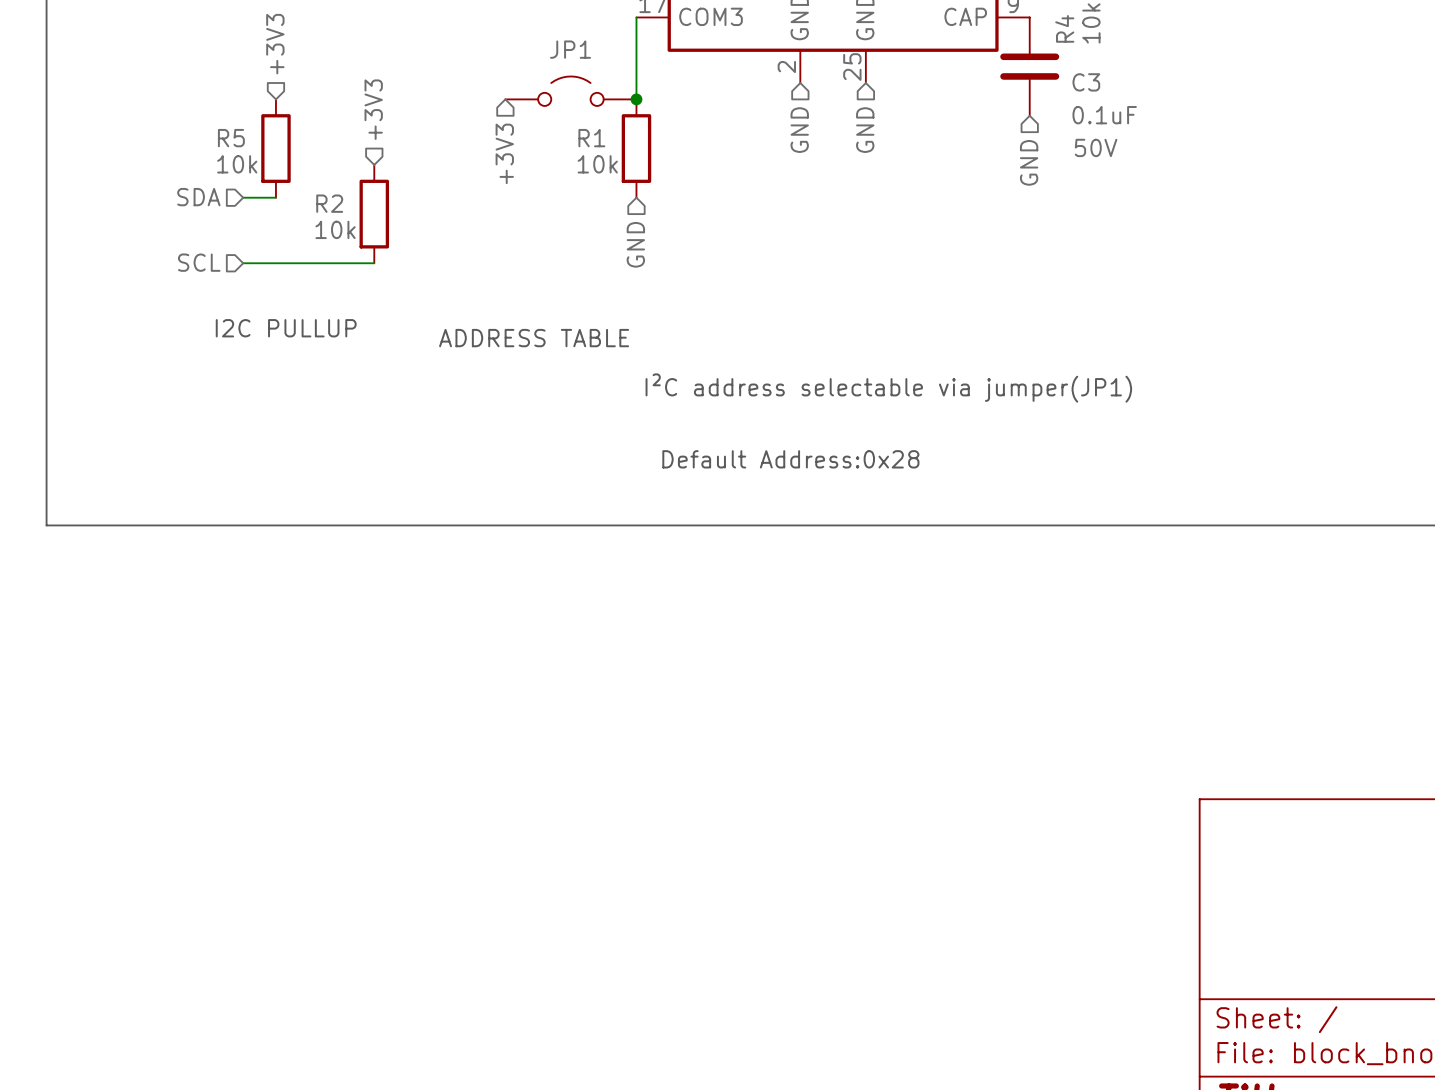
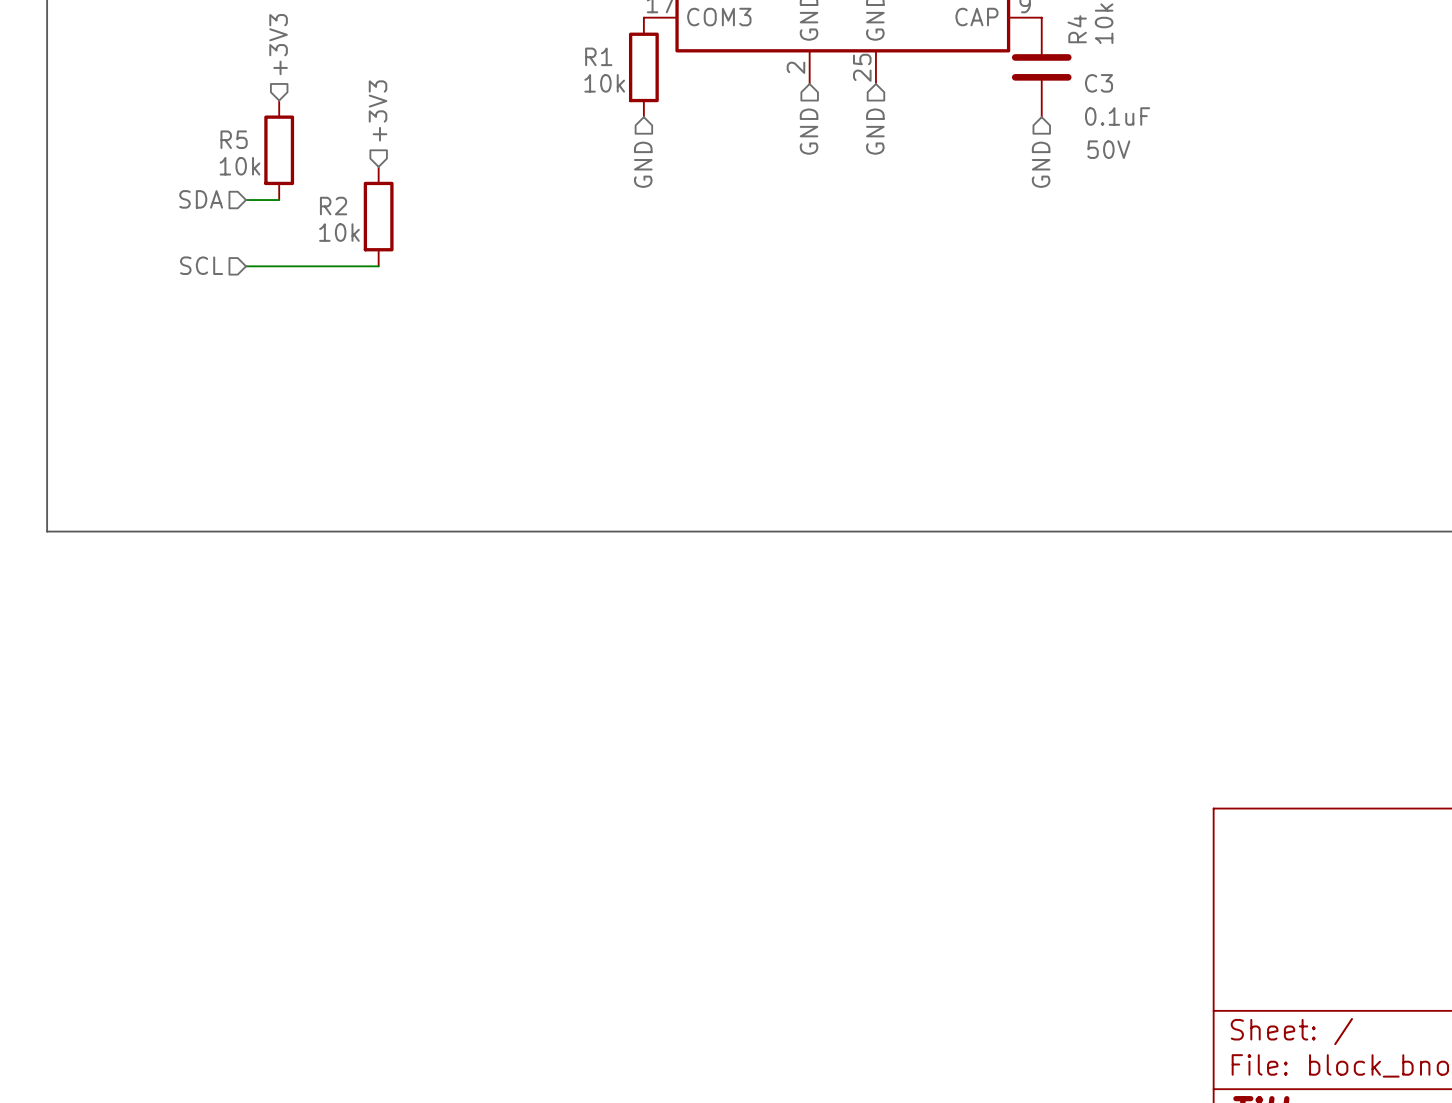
wire: (636, 17) (636, 99) -> none
JP1: (570, 91) -> none
junction: (636, 99) -> none
R1 position: (636, 148) -> (643, 67)
hierarchical label: +3V3 (504, 153) -> none
hierarchical label position: GND (635, 244) -> GND (643, 164)
text: I2C PULLUP (286, 328) -> none
text: ADDRESS TABLE (534, 338) -> none
text: I²C address selectable via jumper(JP1) (888, 388) -> none
text: Default Address:0x28 (790, 459) -> none

